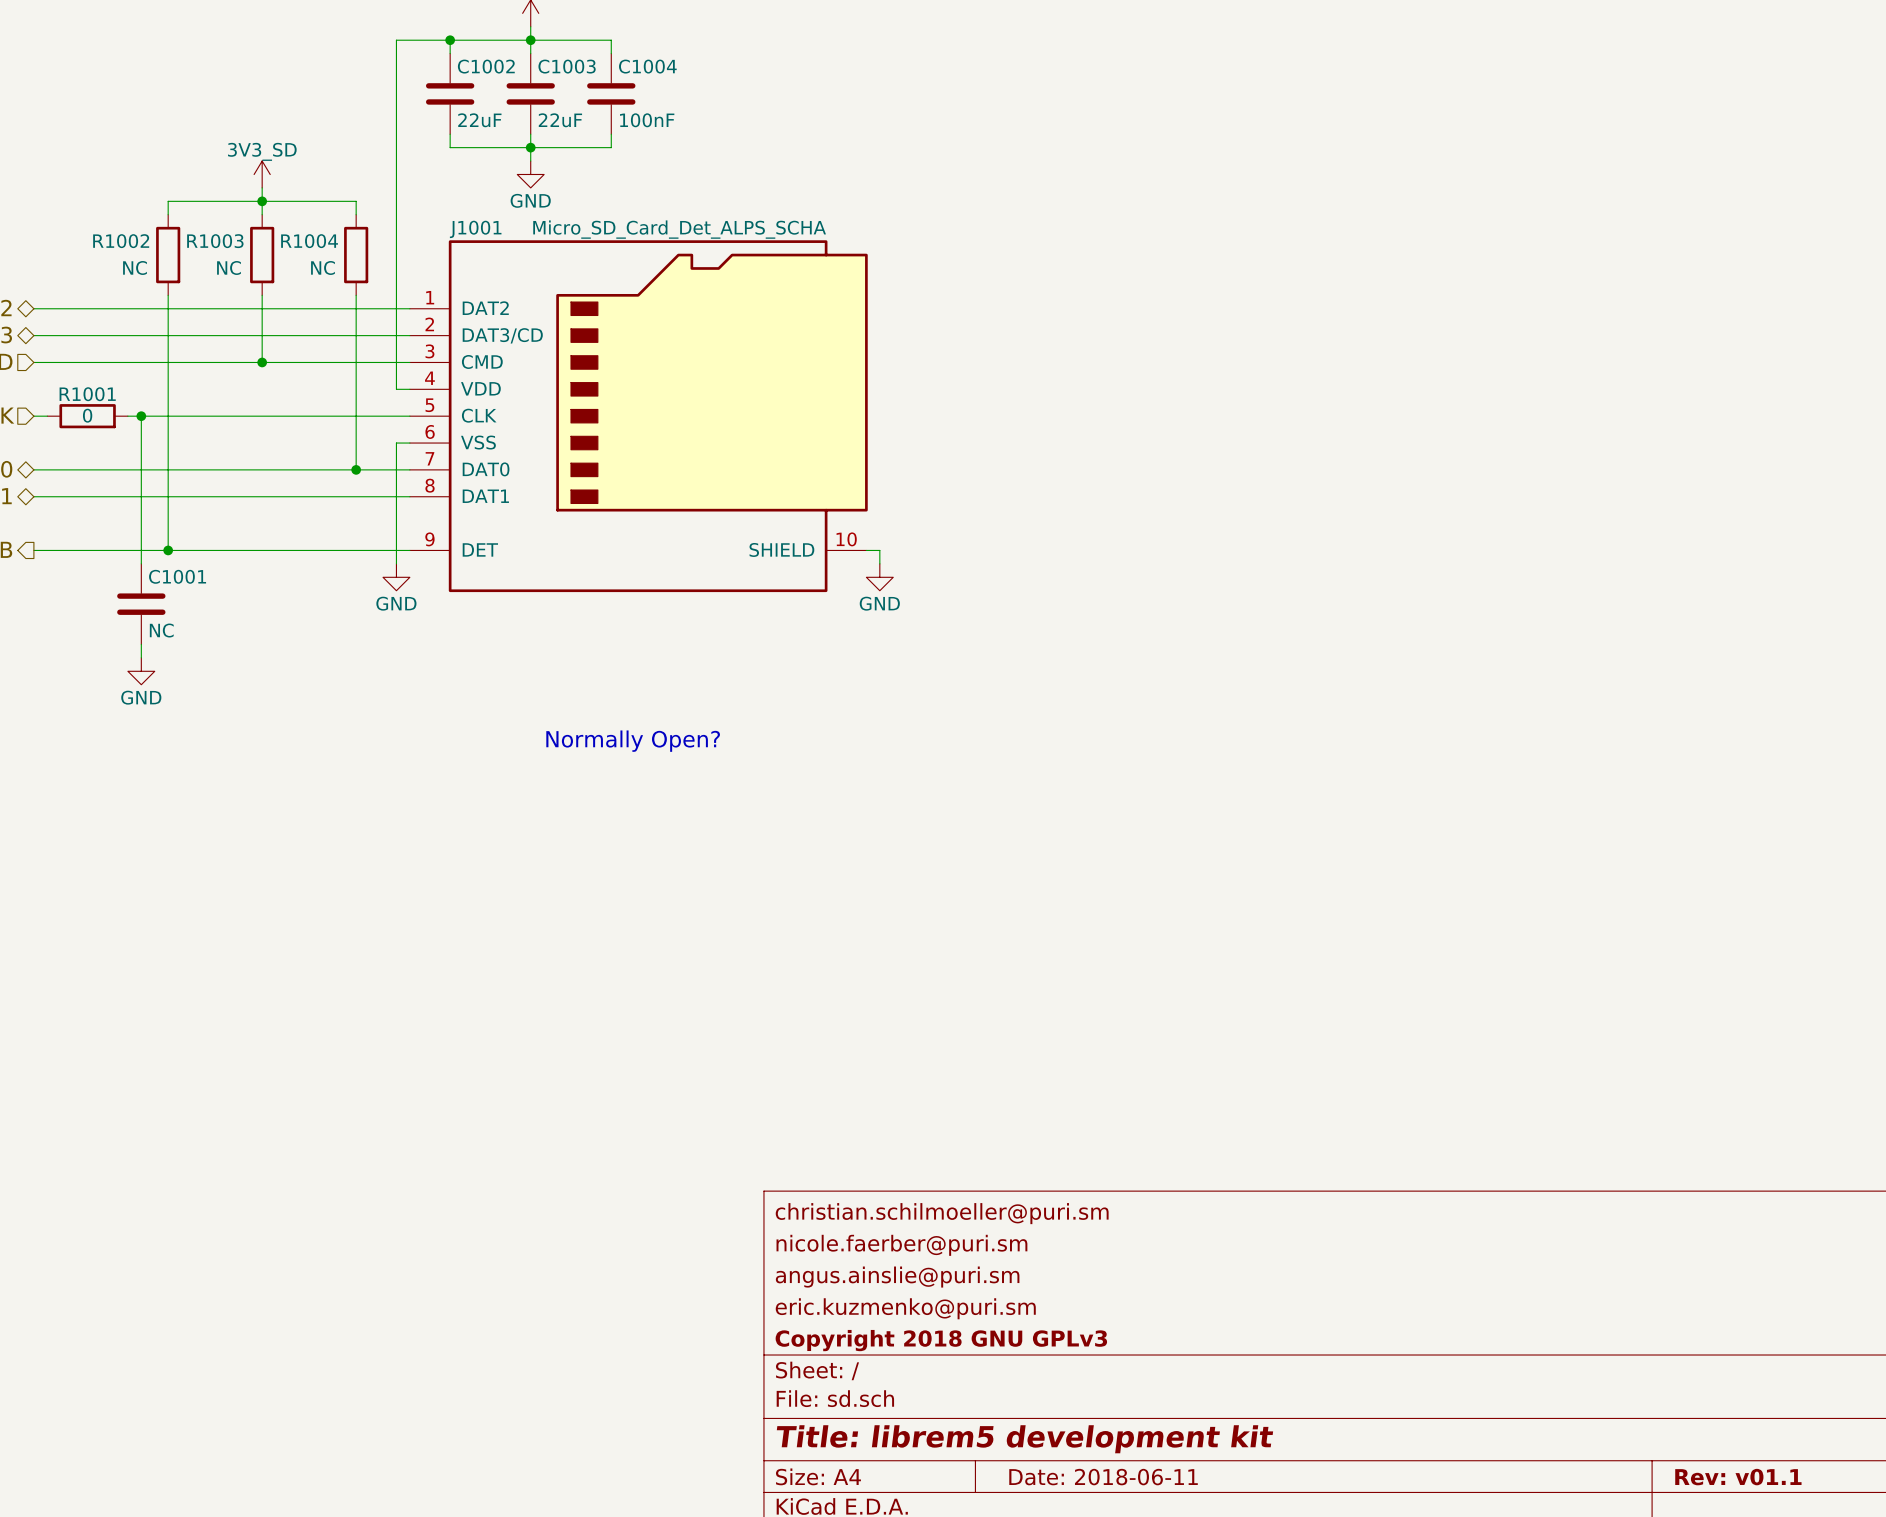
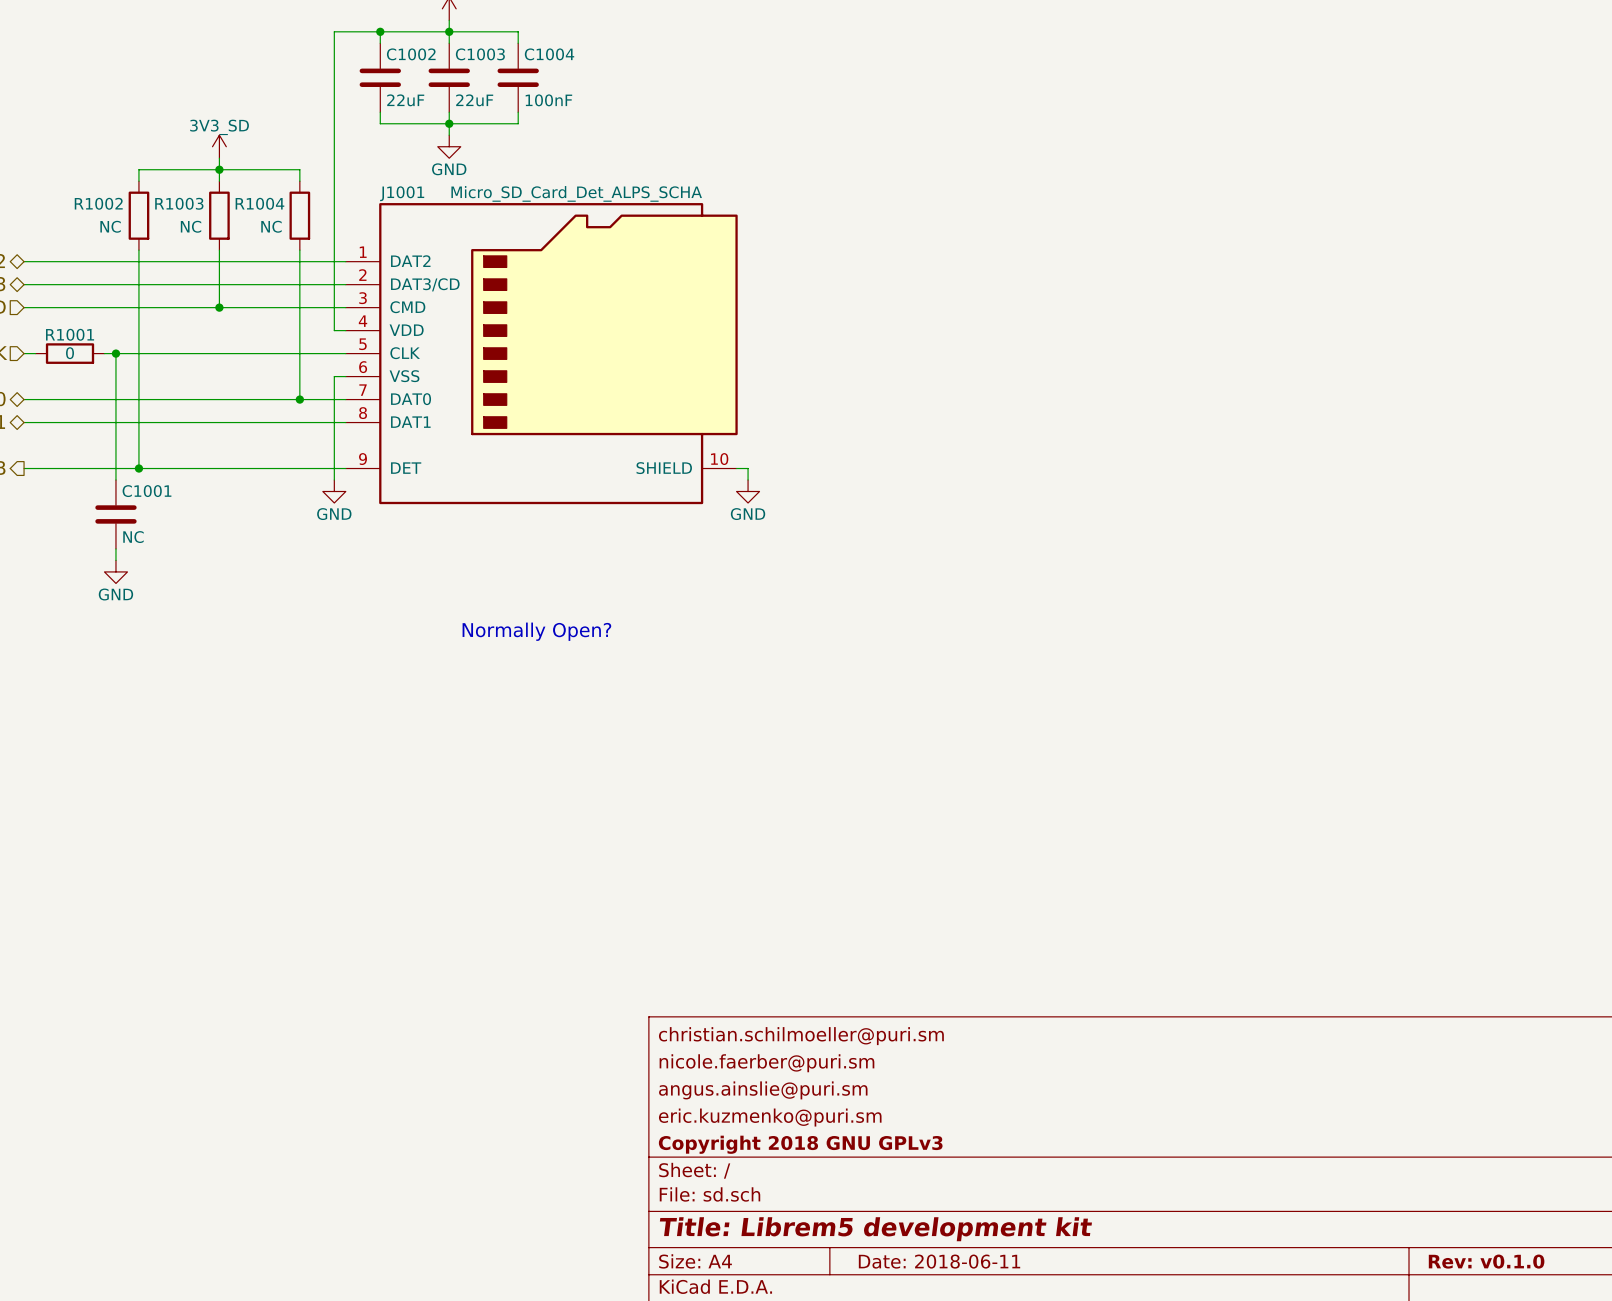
title block: Title: librem5 development kit (1024, 1439) -> Title: Librem5 development kit (875, 1229)
title block: Rev: v01.1 (1738, 1477) -> Rev: v0.1.0 (1486, 1261)

